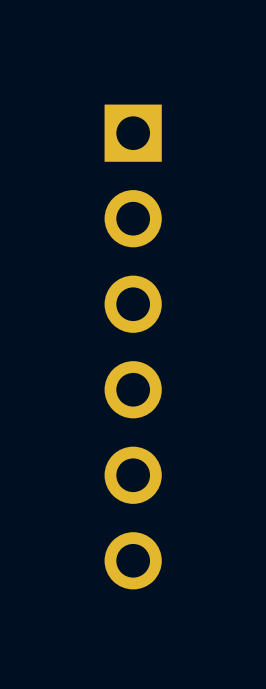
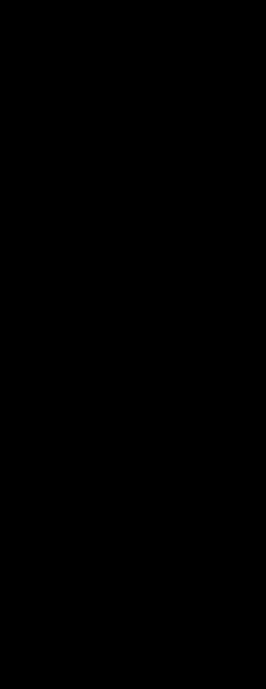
part: (133, 346) -> none

